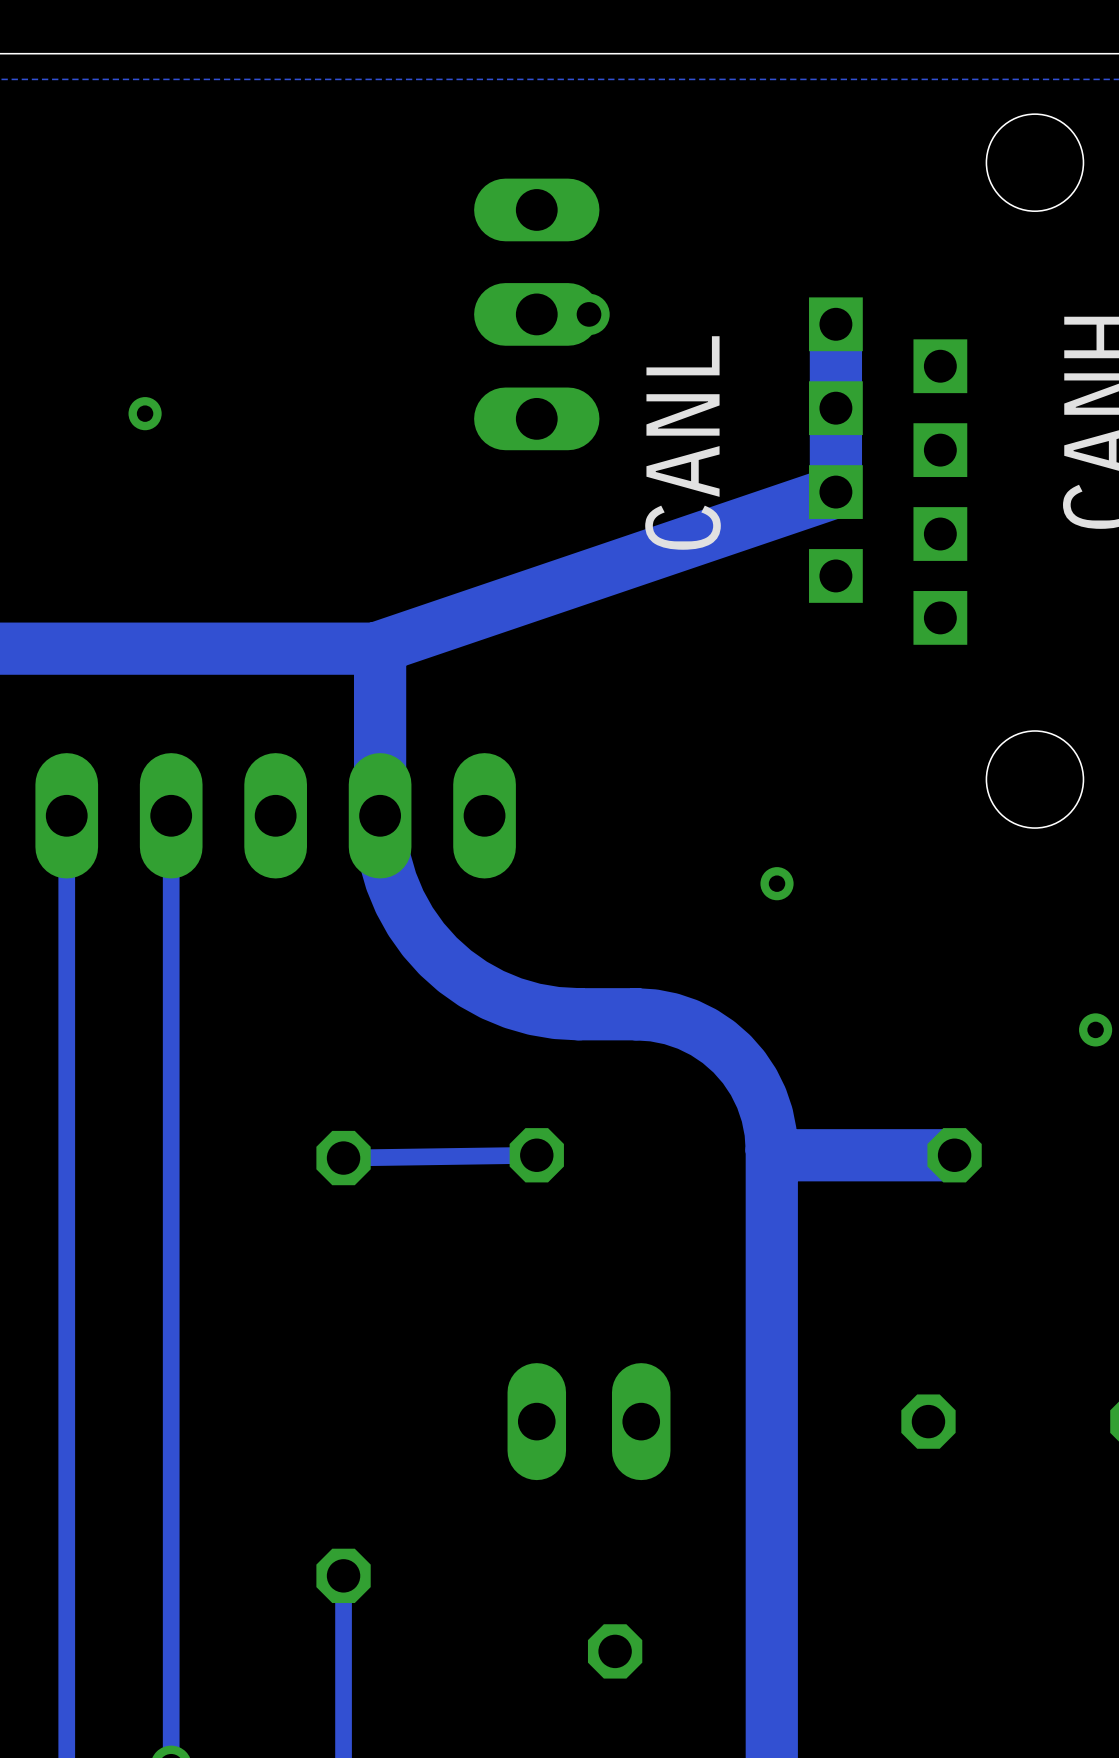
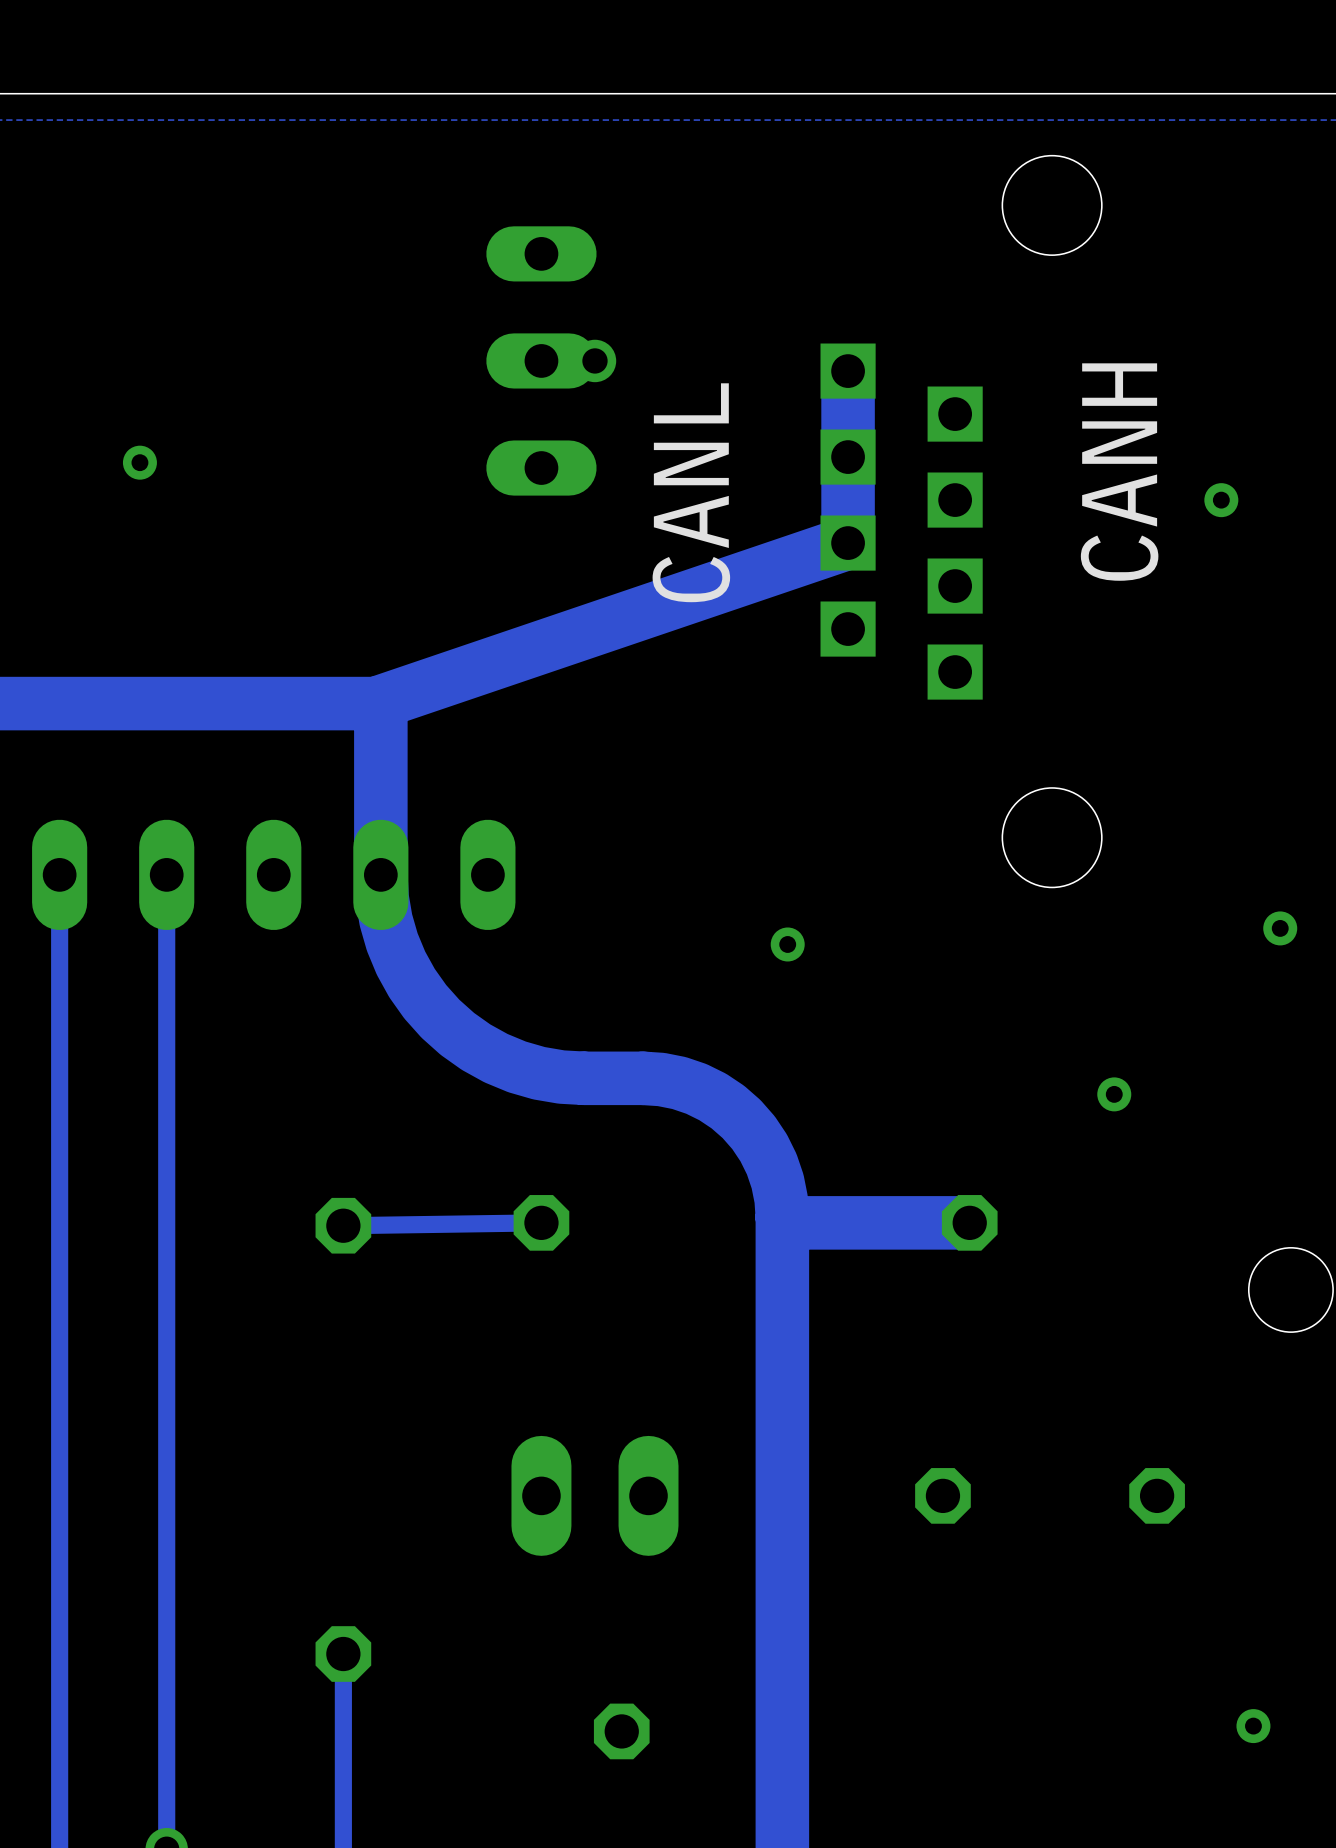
part footprint: [474, 178, 600, 451] -> [486, 226, 597, 496]
part footprint: [35, 753, 516, 879] -> [32, 819, 516, 931]

